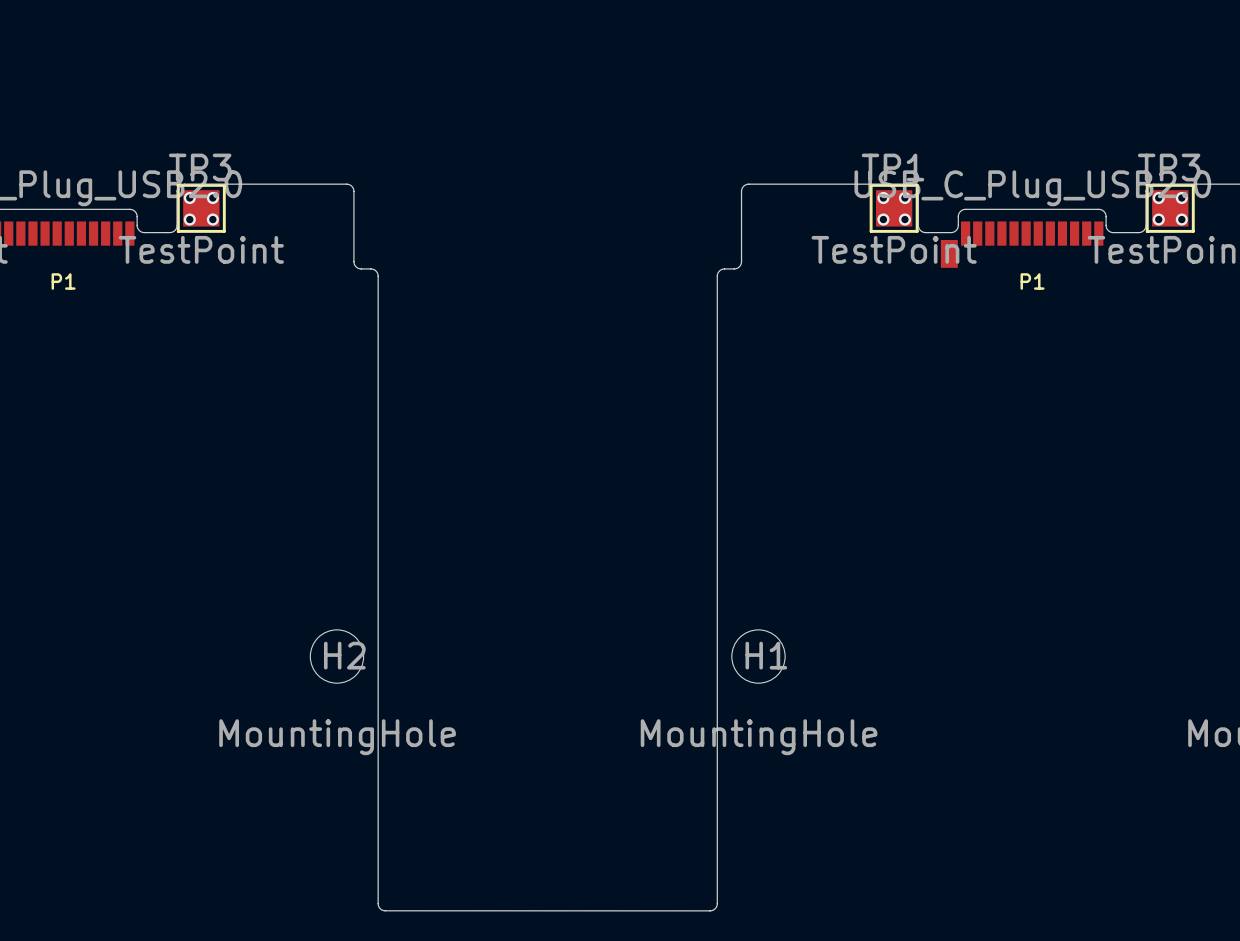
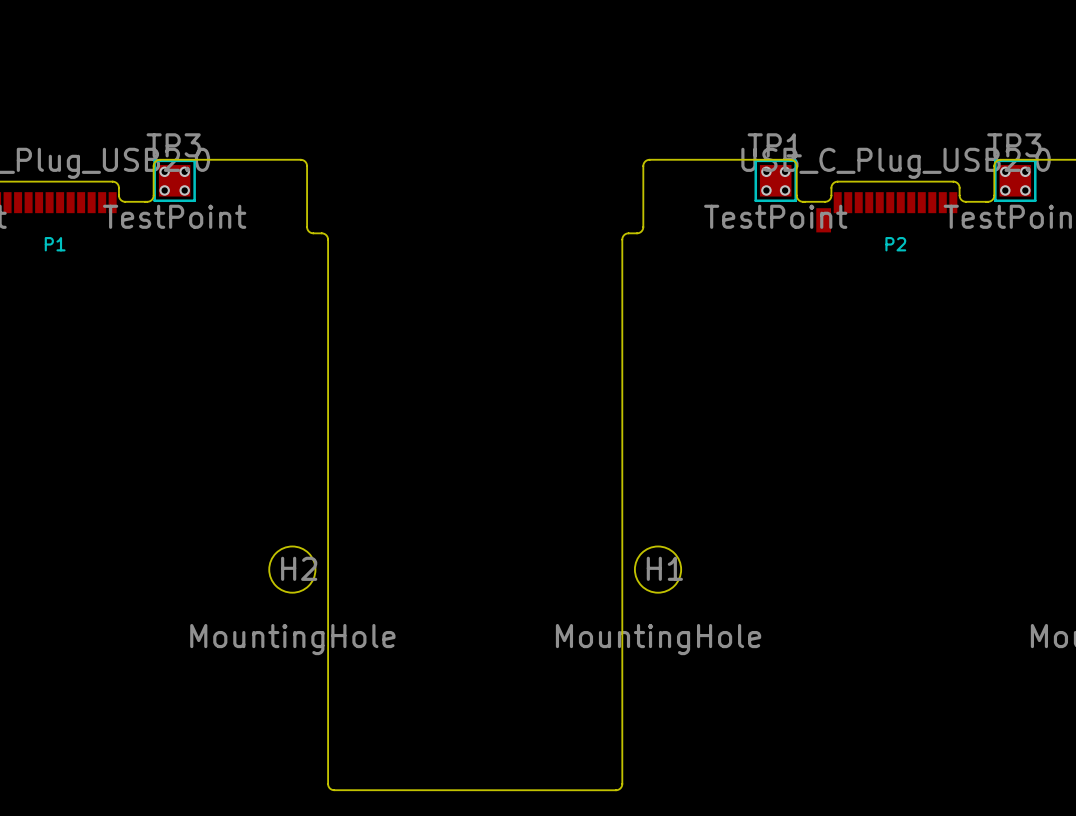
P1 name: P1 (1032, 281) -> P2 (895, 244)

